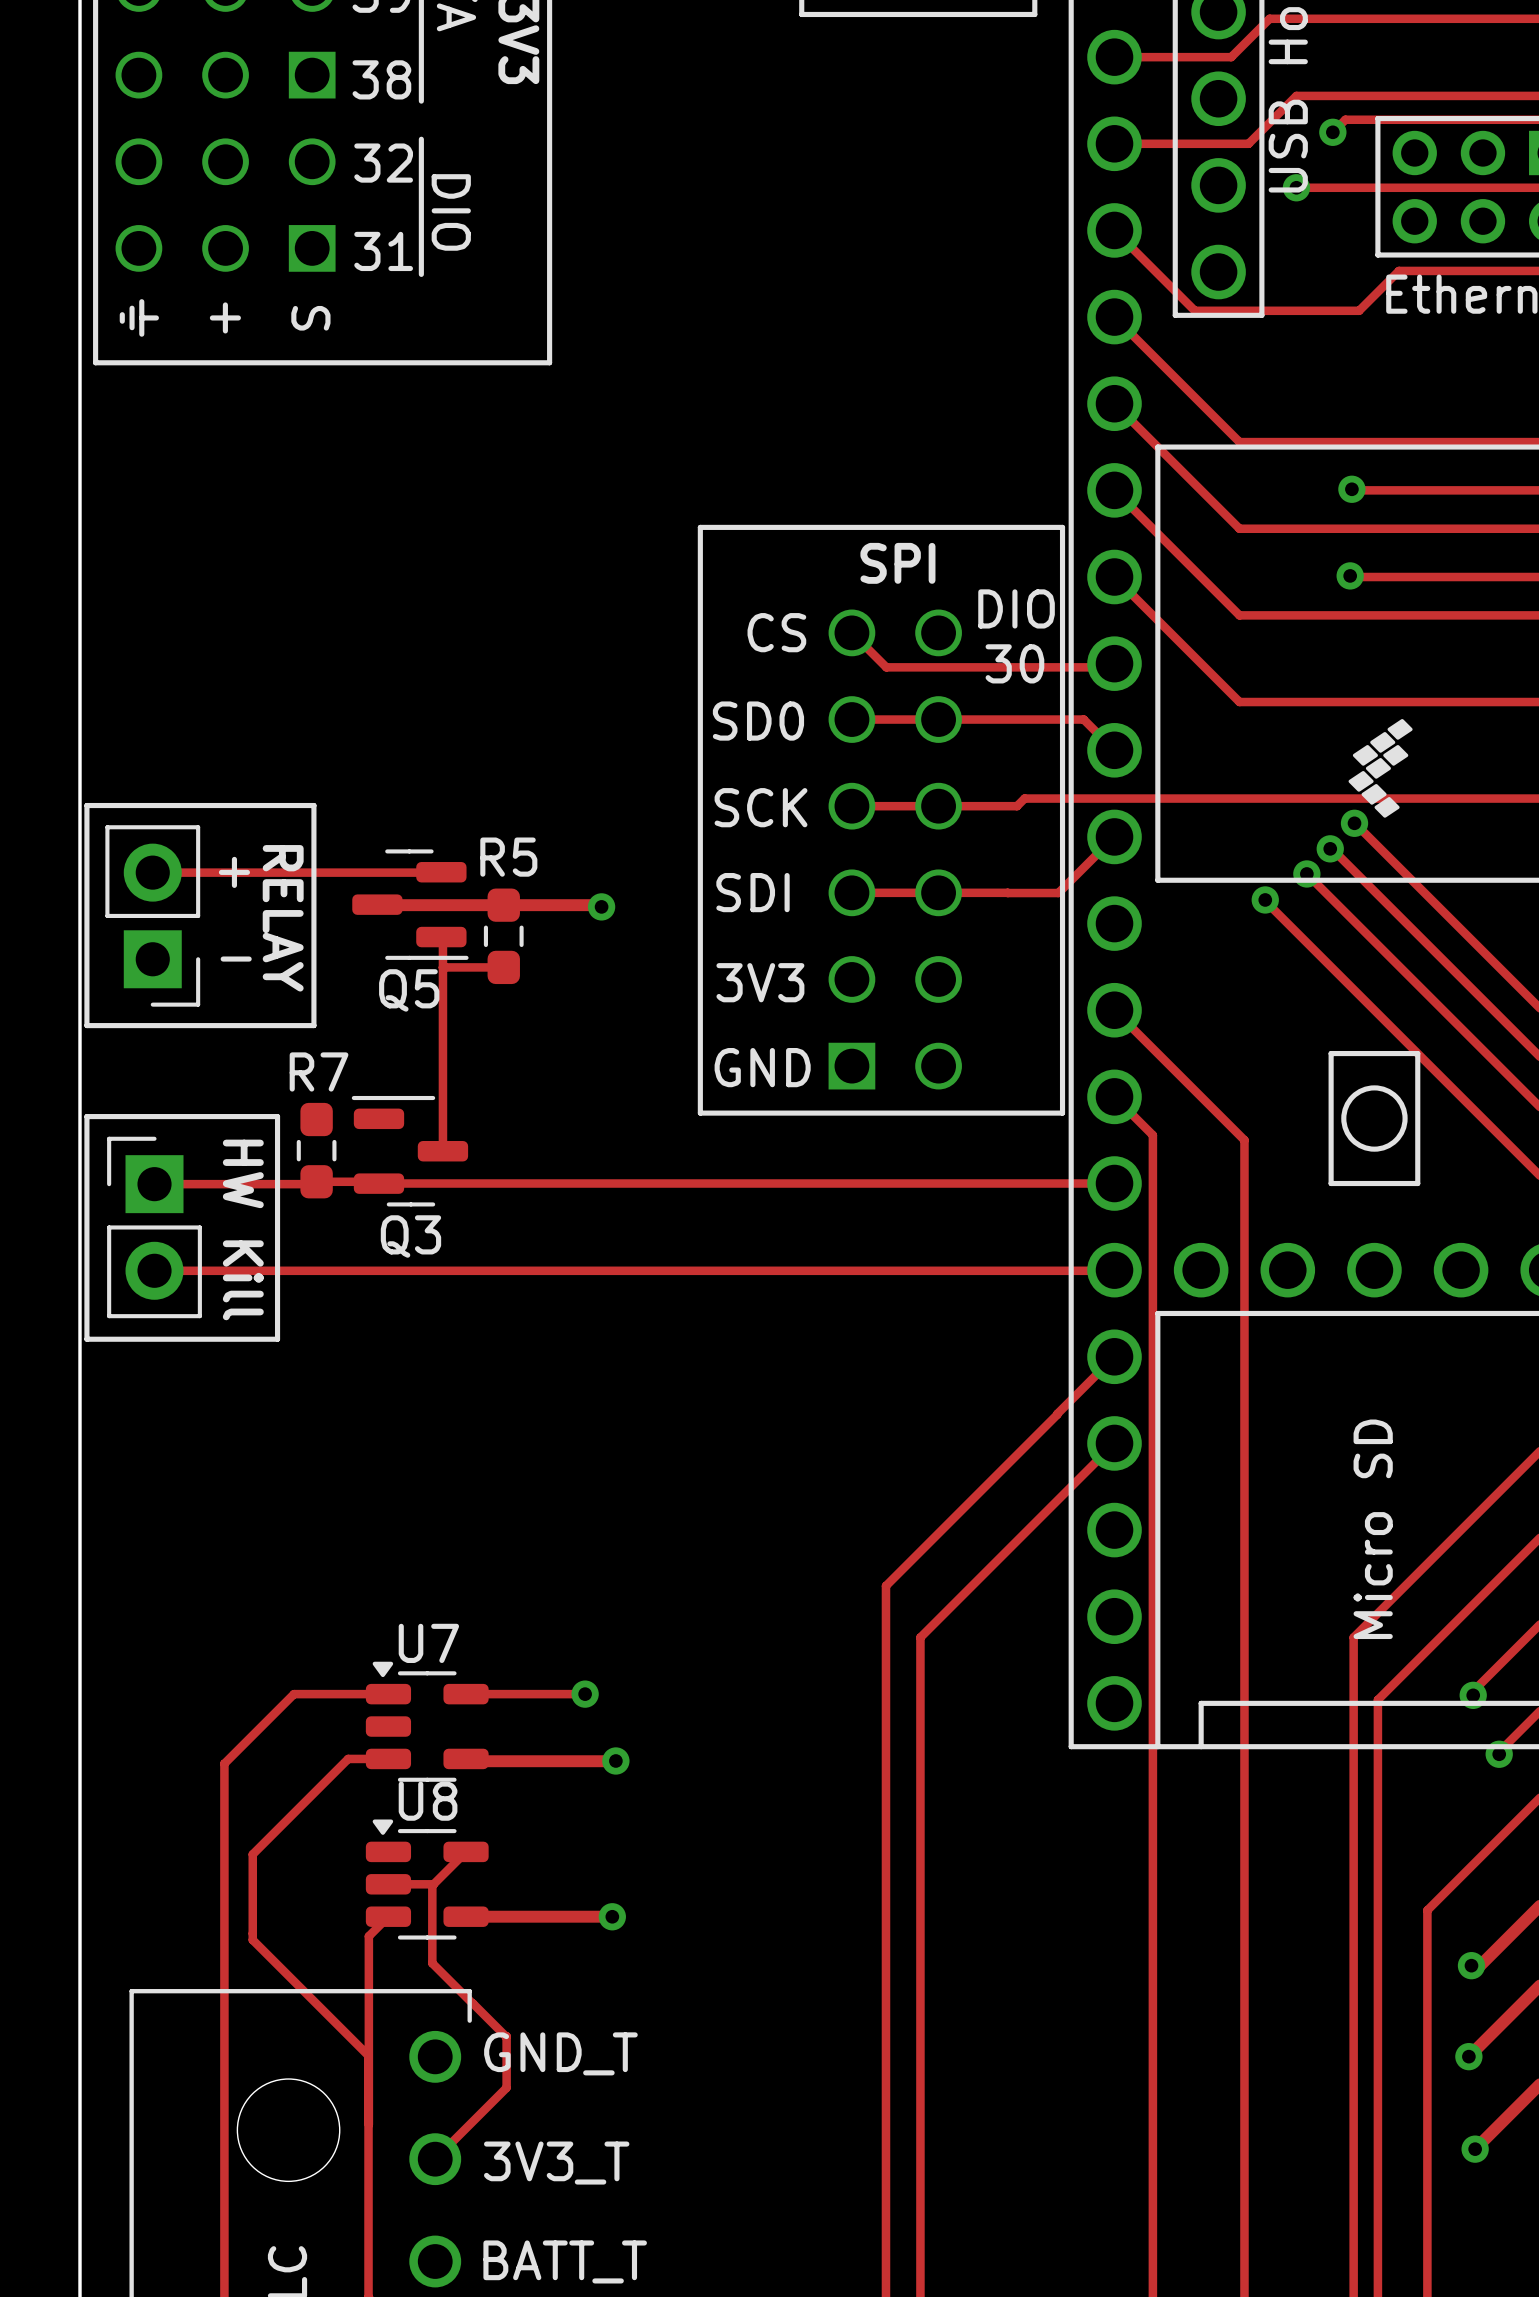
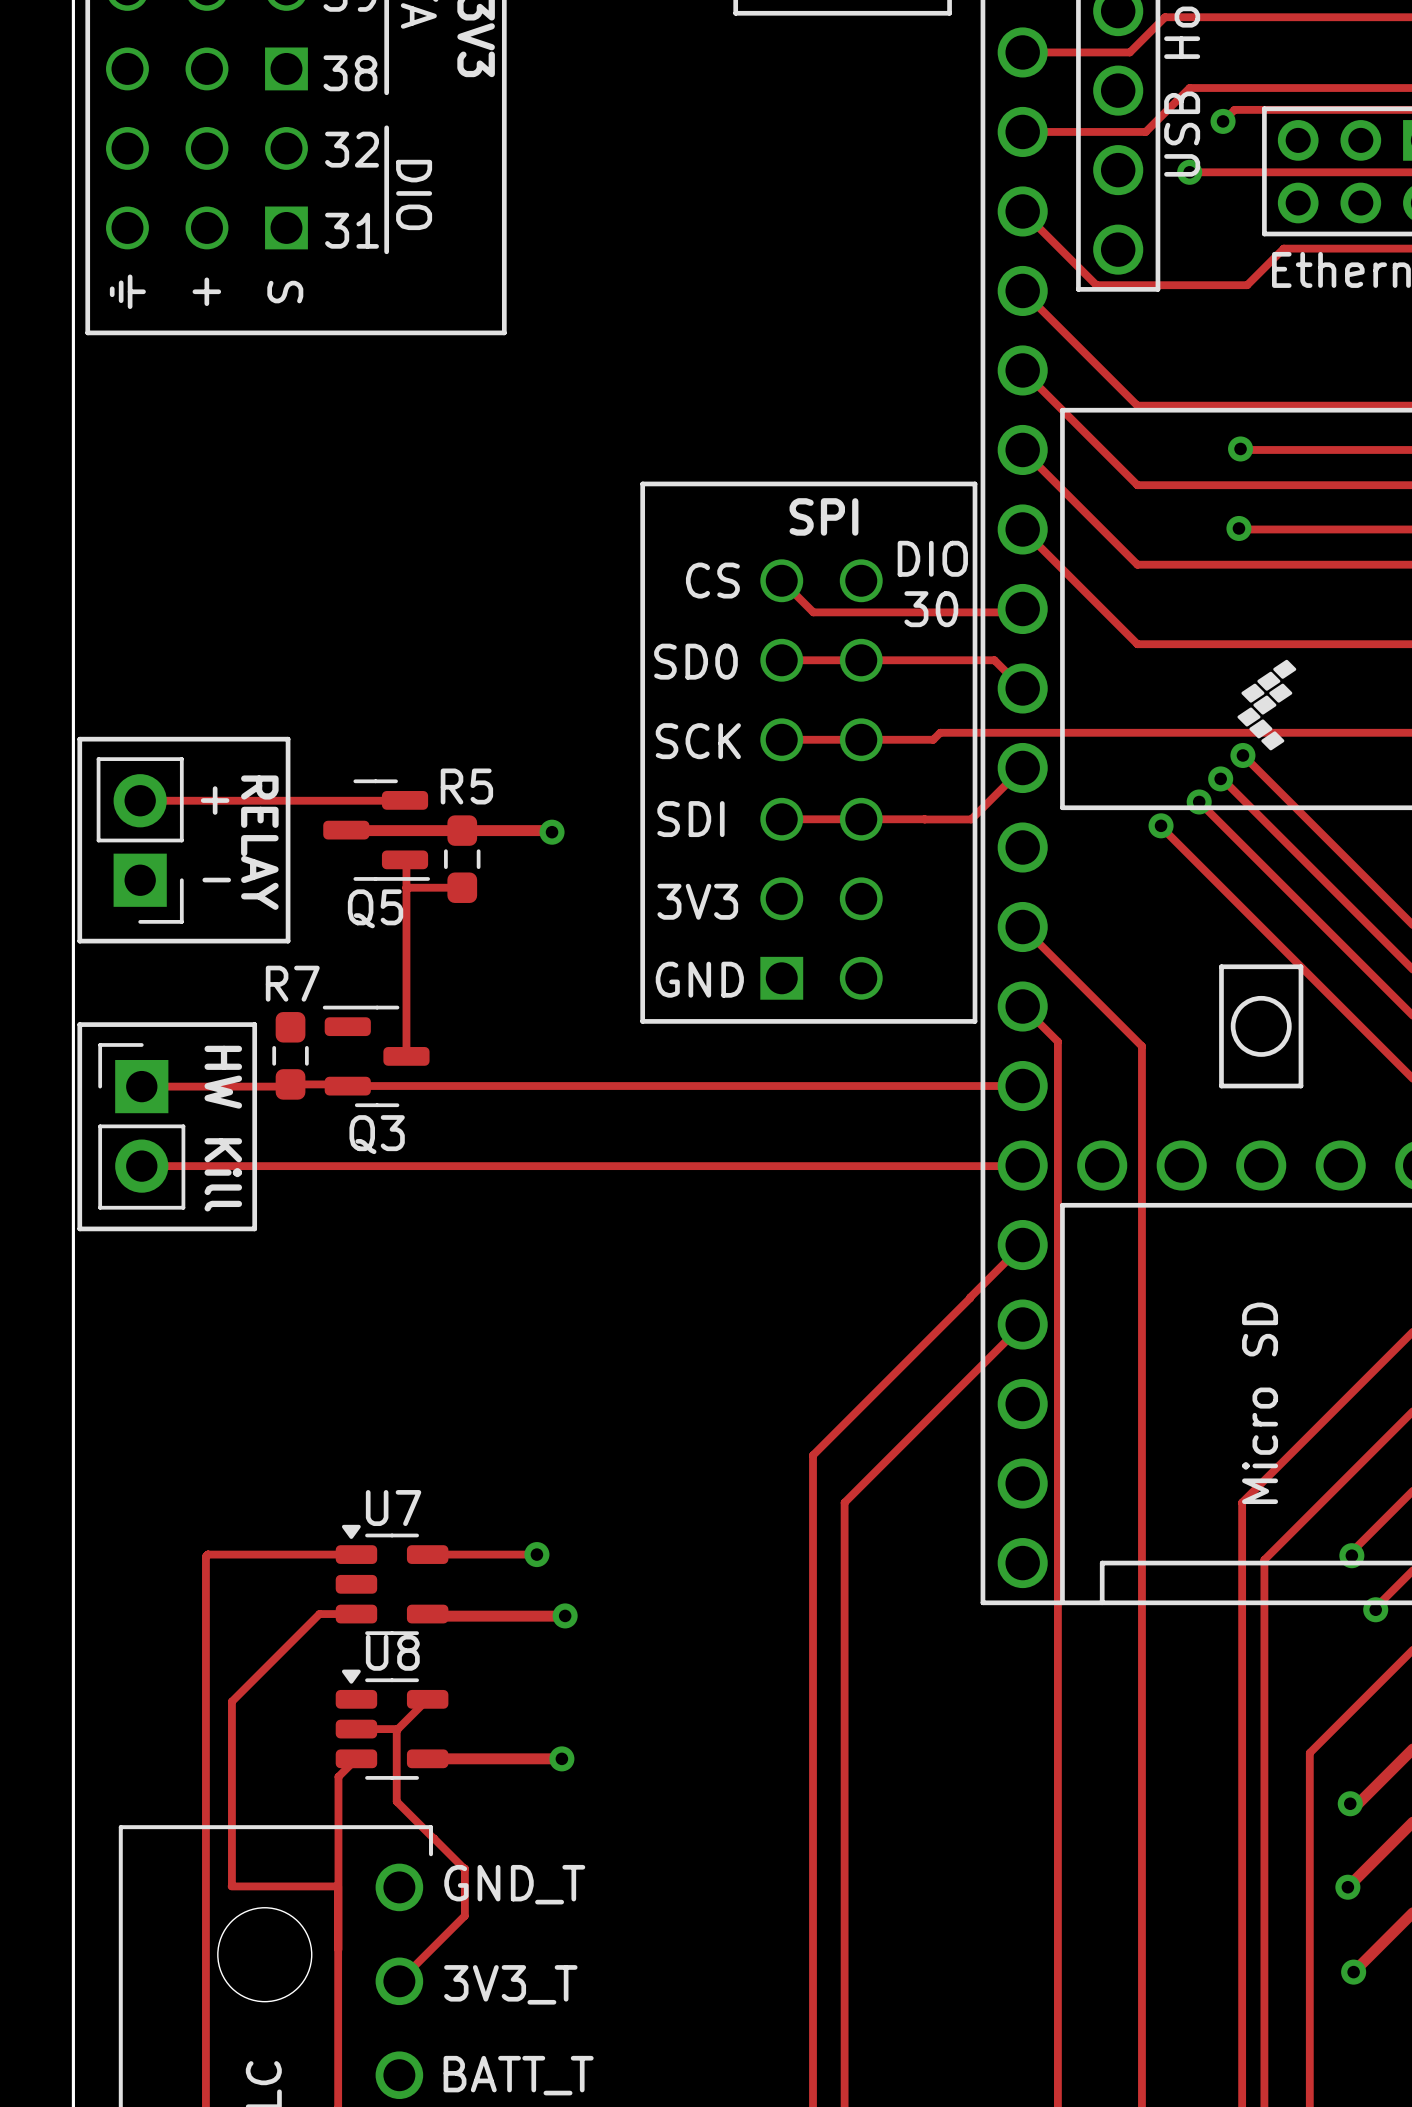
track: (294, 1694) (224, 1763) -> (269, 1554) (208, 1554) (205, 1556) (205, 1618)
track: (252, 1940) (368, 2055) -> (231, 1886) (338, 1886)
track: none -> (231, 1780) (231, 1886)

